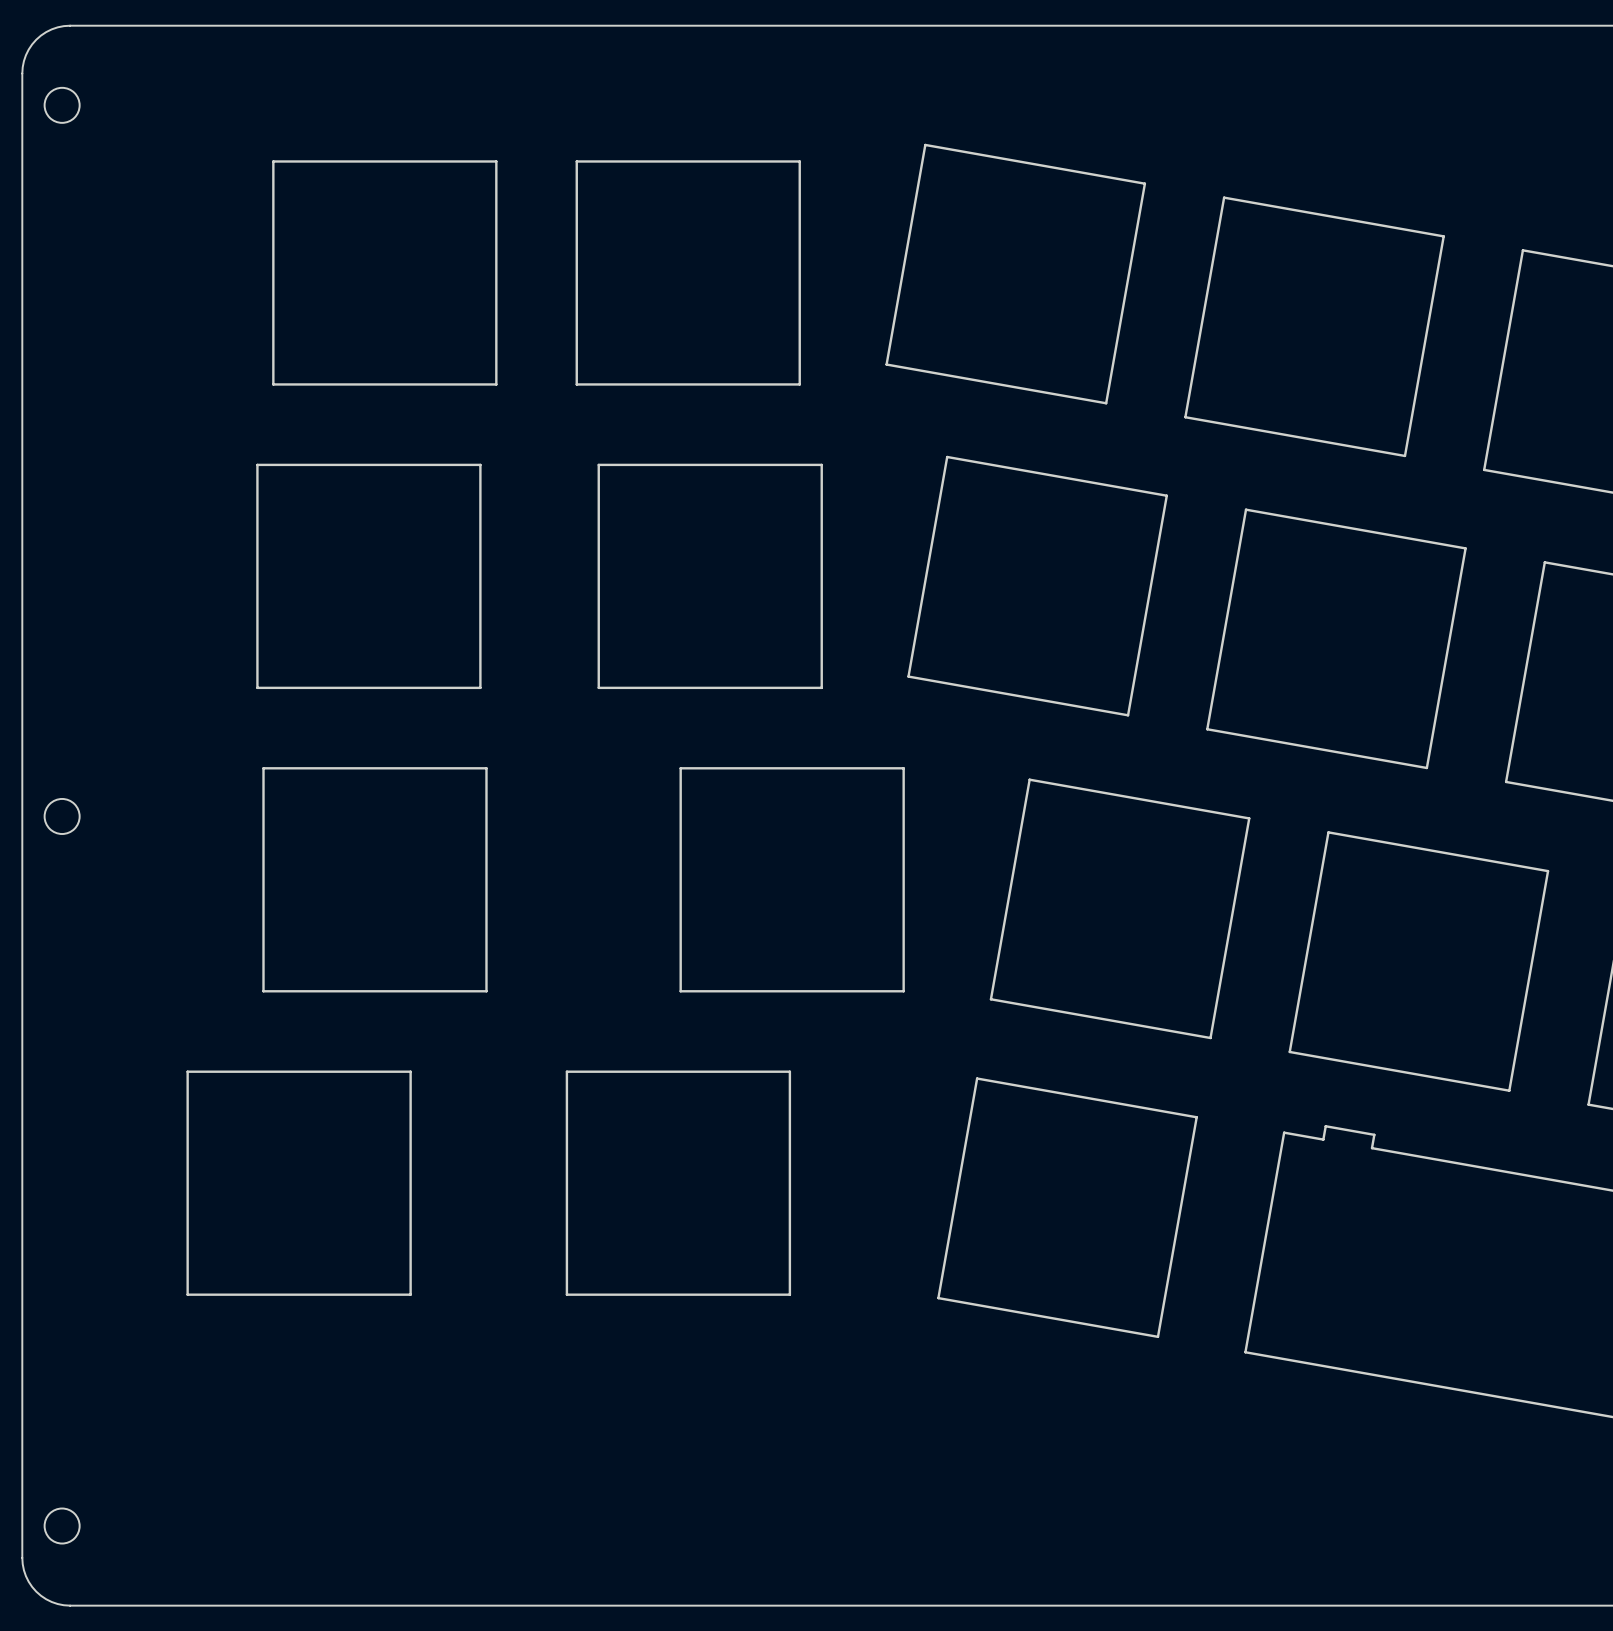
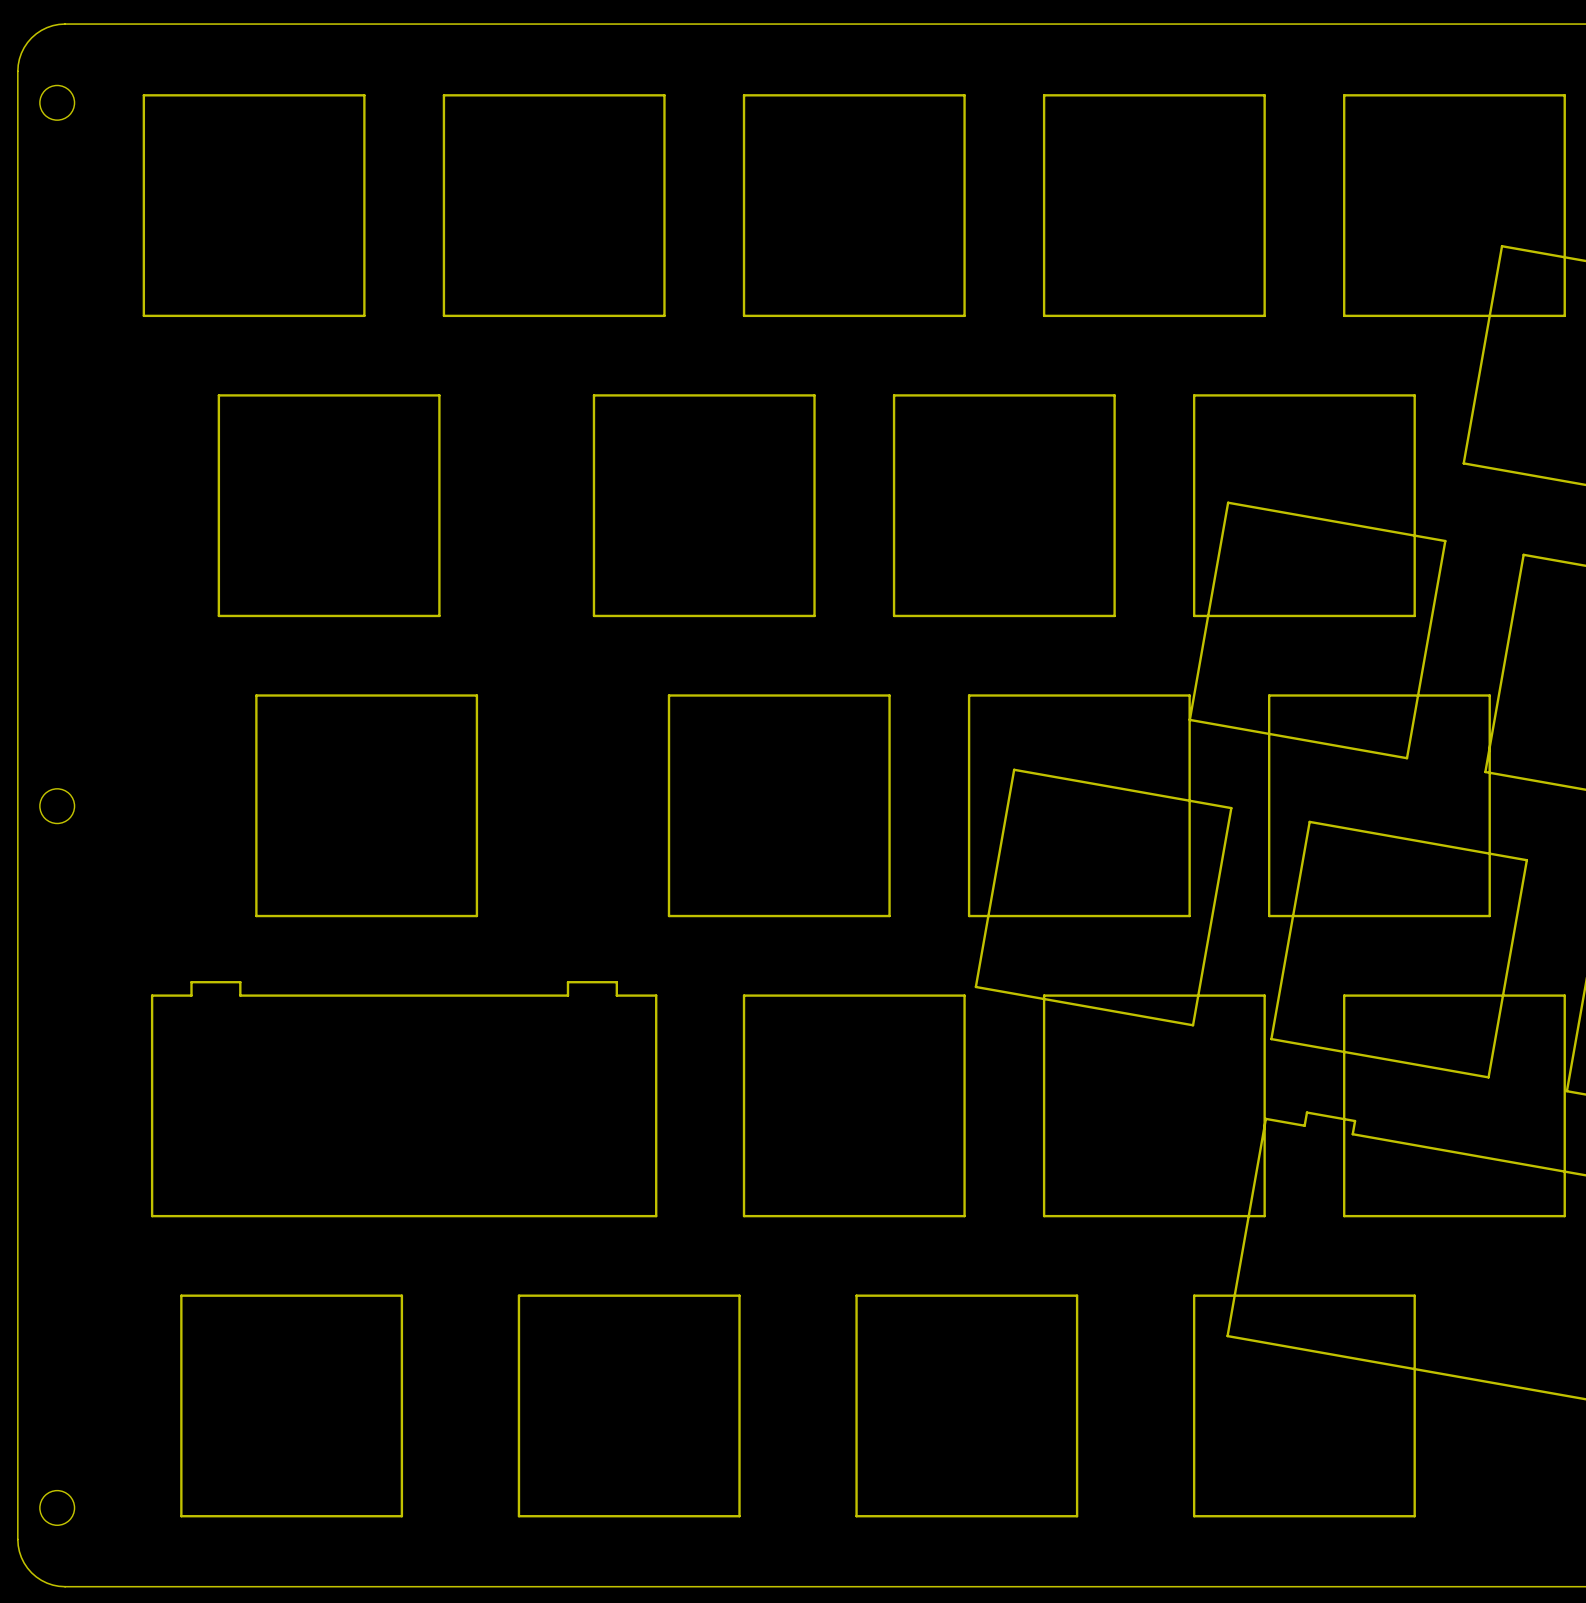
drawing: none -> [142, 94, 366, 318]
drawing: none -> [442, 94, 666, 318]
drawing: none -> [742, 94, 966, 318]
drawing: none -> [1042, 94, 1266, 318]
drawing: none -> [1343, 94, 1566, 318]
drawing: [885, 143, 1147, 405] -> none
drawing: [272, 160, 498, 386] -> none
drawing: [575, 160, 801, 386] -> none
drawing: [907, 196, 1445, 717] -> none
drawing: none -> [892, 394, 1116, 618]
drawing: none -> [1192, 394, 1416, 618]
drawing position: (368, 576) -> (329, 505)
drawing position: (710, 576) -> (704, 505)
drawing: none -> [967, 694, 1191, 918]
drawing: none -> [1267, 694, 1491, 918]
drawing position: (374, 879) -> (366, 805)
drawing position: (792, 879) -> (779, 805)
drawing: none -> [150, 981, 658, 1218]
drawing: none -> [742, 994, 966, 1218]
drawing: none -> [1042, 994, 1266, 1218]
drawing: none -> [1343, 994, 1566, 1218]
drawing: [186, 1070, 412, 1296] -> none
drawing: [565, 1070, 792, 1296] -> none
drawing: [937, 1077, 1198, 1339] -> none
drawing: none -> [180, 1294, 404, 1518]
drawing: none -> [517, 1294, 741, 1518]
drawing: none -> [855, 1294, 1079, 1518]
drawing: none -> [1192, 1294, 1416, 1518]

